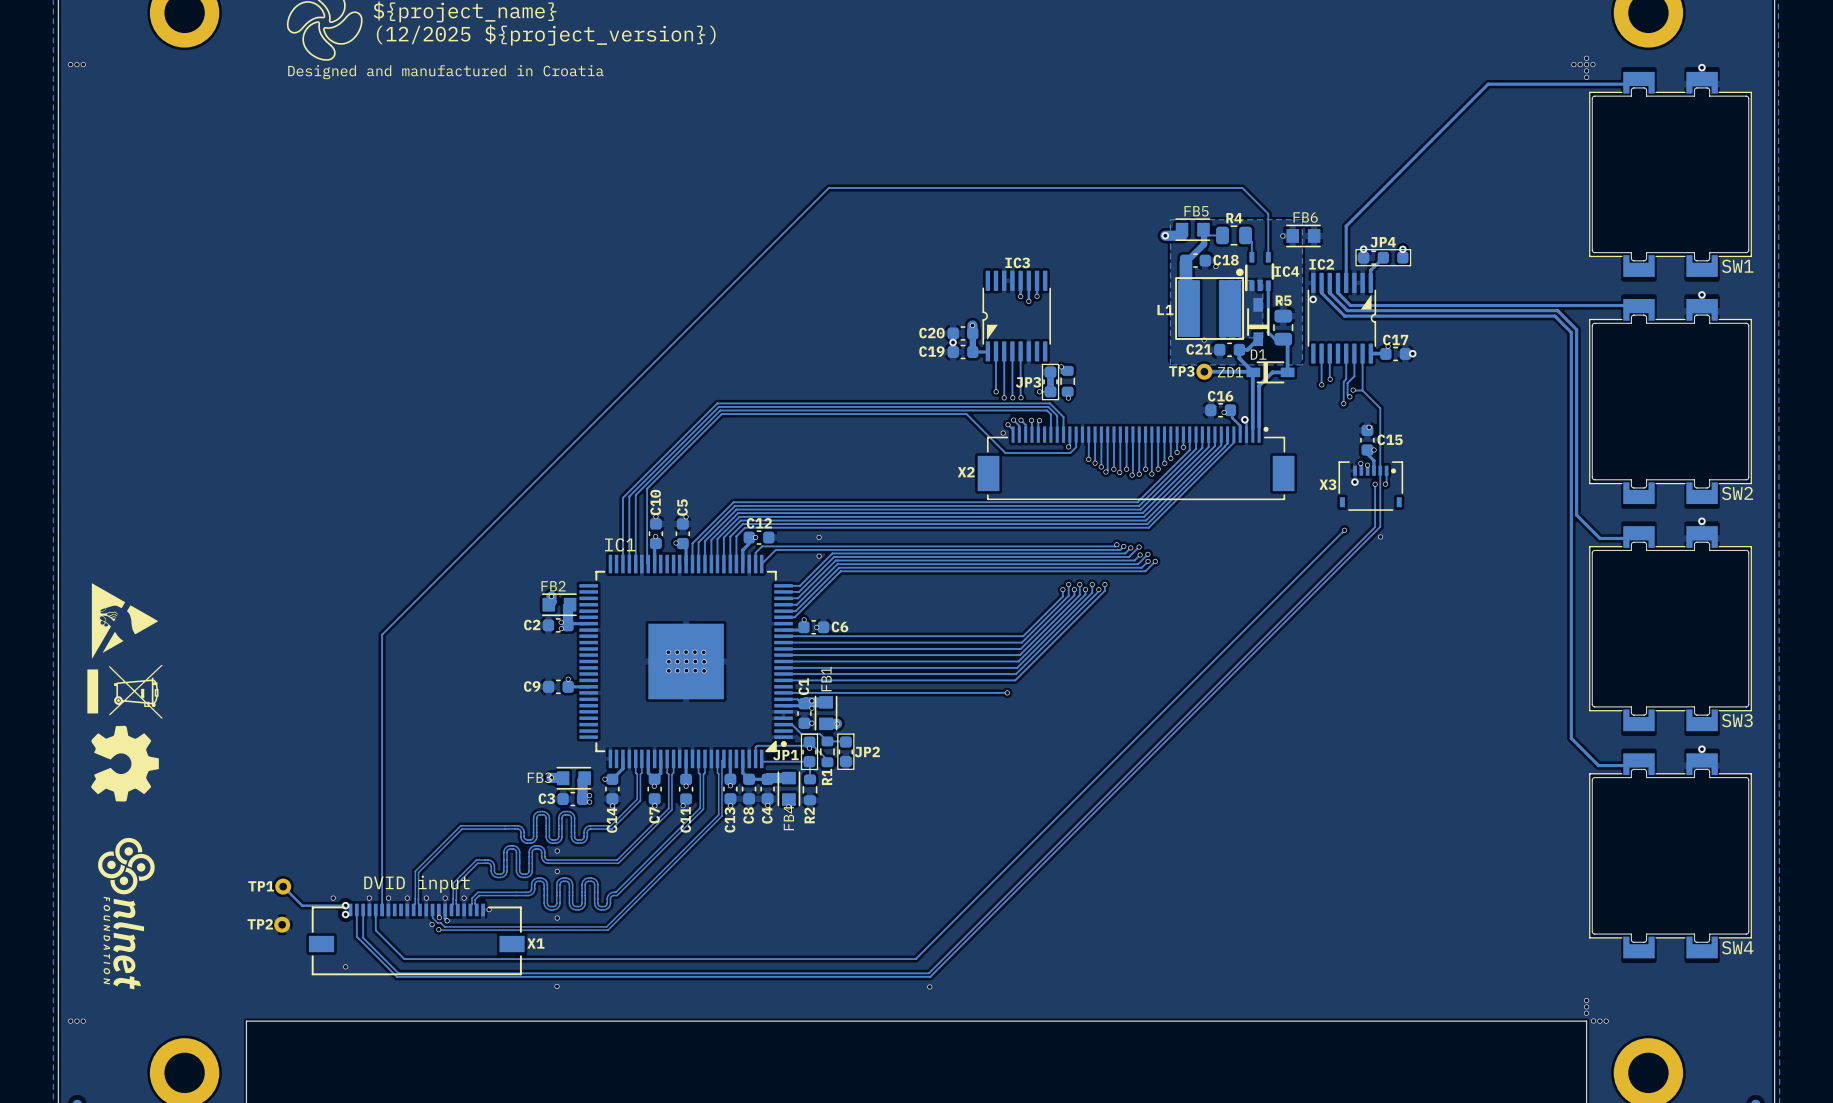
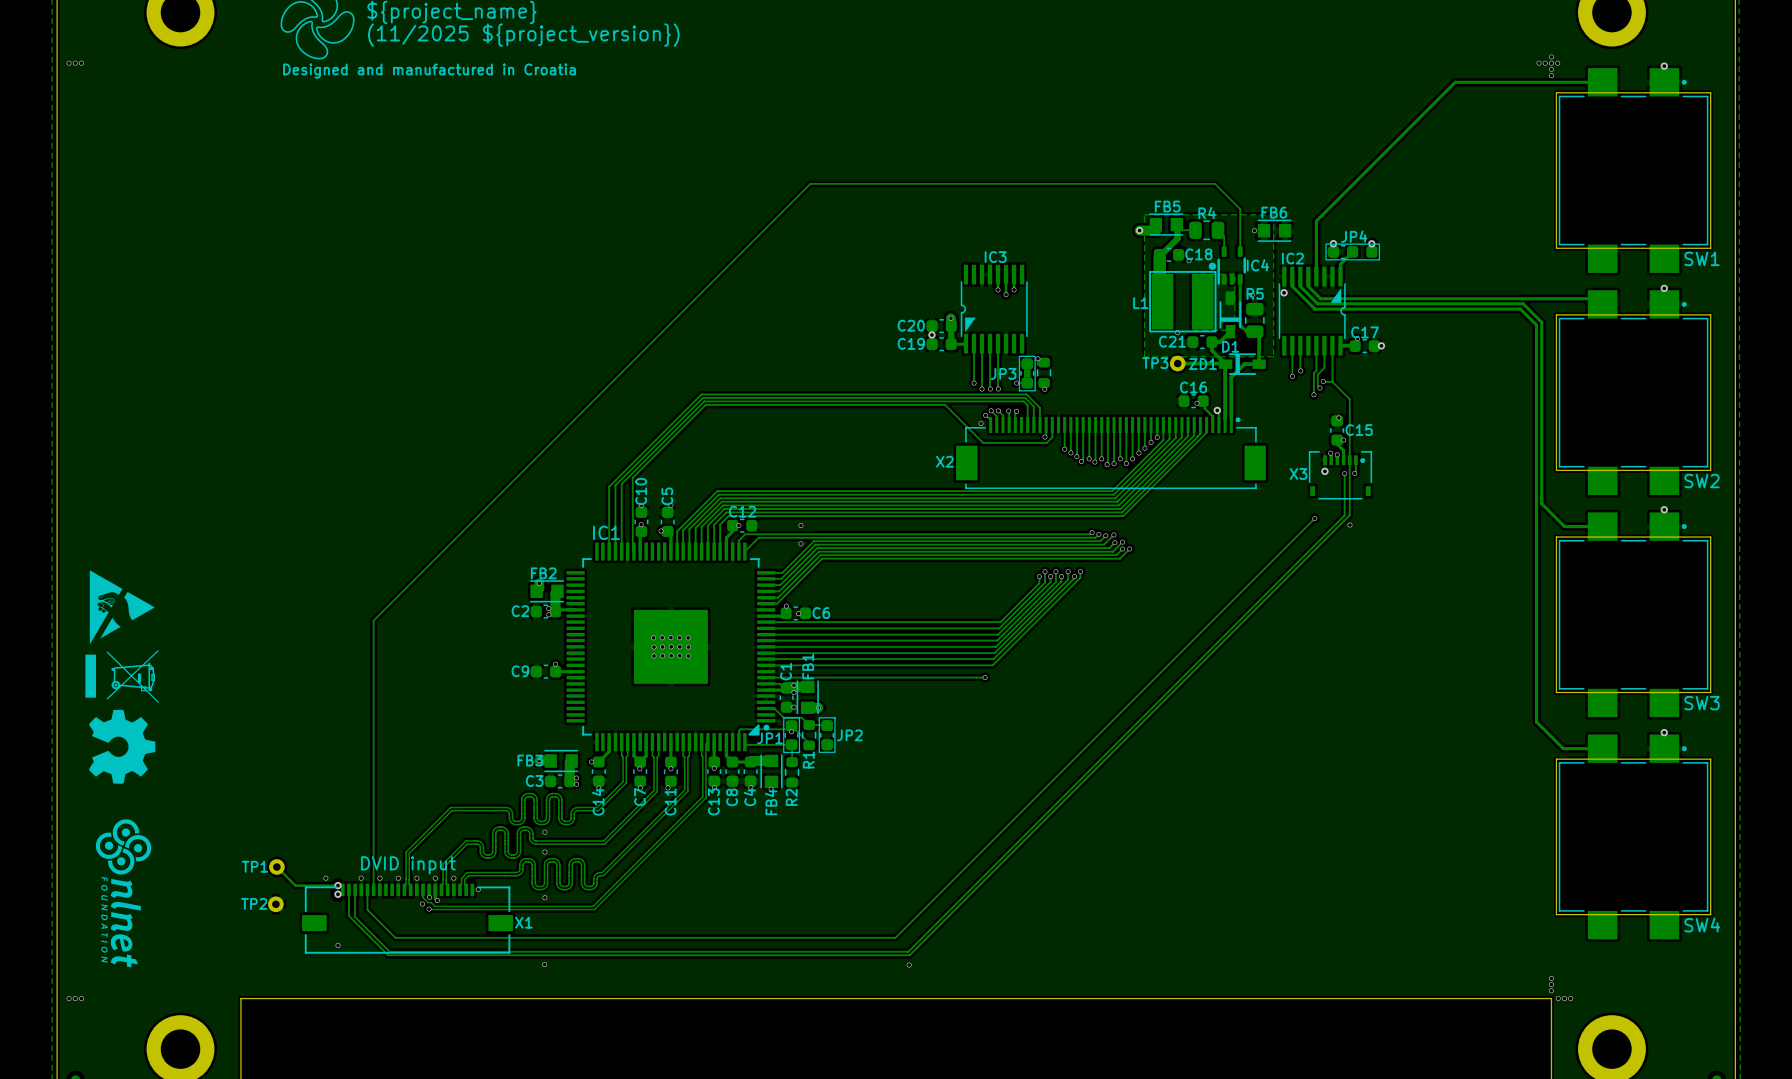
text: (12/2025 ${project_version}) (546, 35) -> (11/2025 ${project_version}) (523, 35)
SW1 footprint: [1589, 71, 1752, 277] -> [1558, 68, 1709, 273]
board edge: none -> (1710, 92) (1710, 248) (1556, 248) (1556, 92) (1710, 92)
SW2 footprint: [1589, 299, 1752, 505] -> [1558, 290, 1709, 496]
board edge: none -> (1710, 314) (1710, 470) (1556, 470) (1556, 314) (1710, 314)
SW3 footprint: [1589, 526, 1752, 732] -> [1558, 512, 1709, 718]
board edge: none -> (1710, 537) (1710, 692) (1556, 692) (1556, 537) (1710, 537)
SW4 footprint: [1589, 753, 1752, 959] -> [1558, 734, 1709, 940]
board edge: none -> (1710, 759) (1556, 759) (1556, 914) (1710, 914) (1710, 759)

